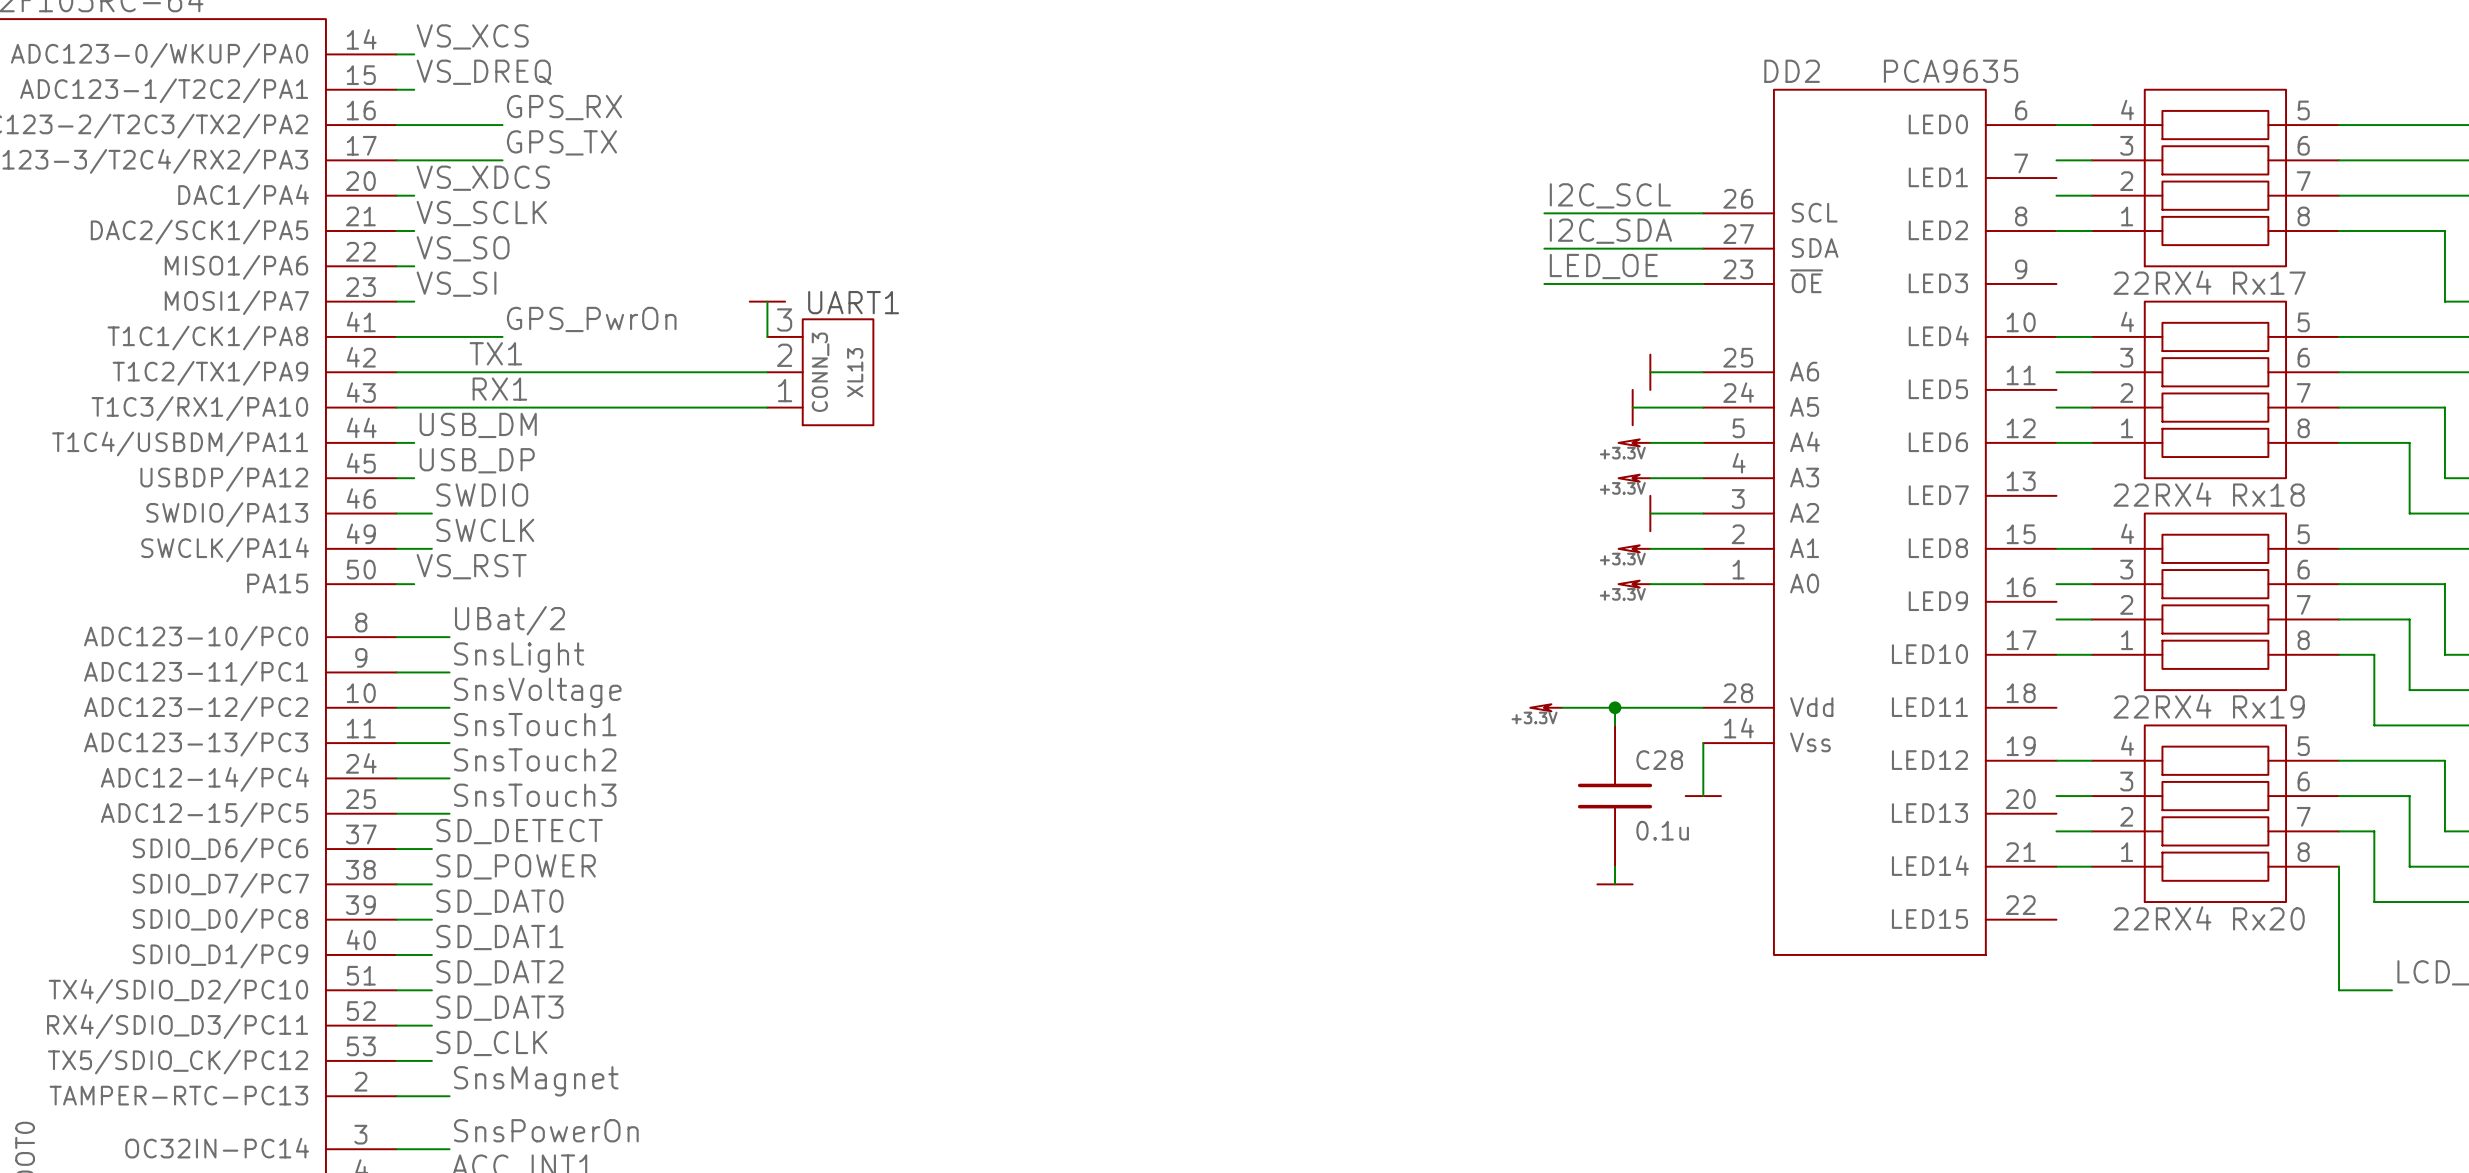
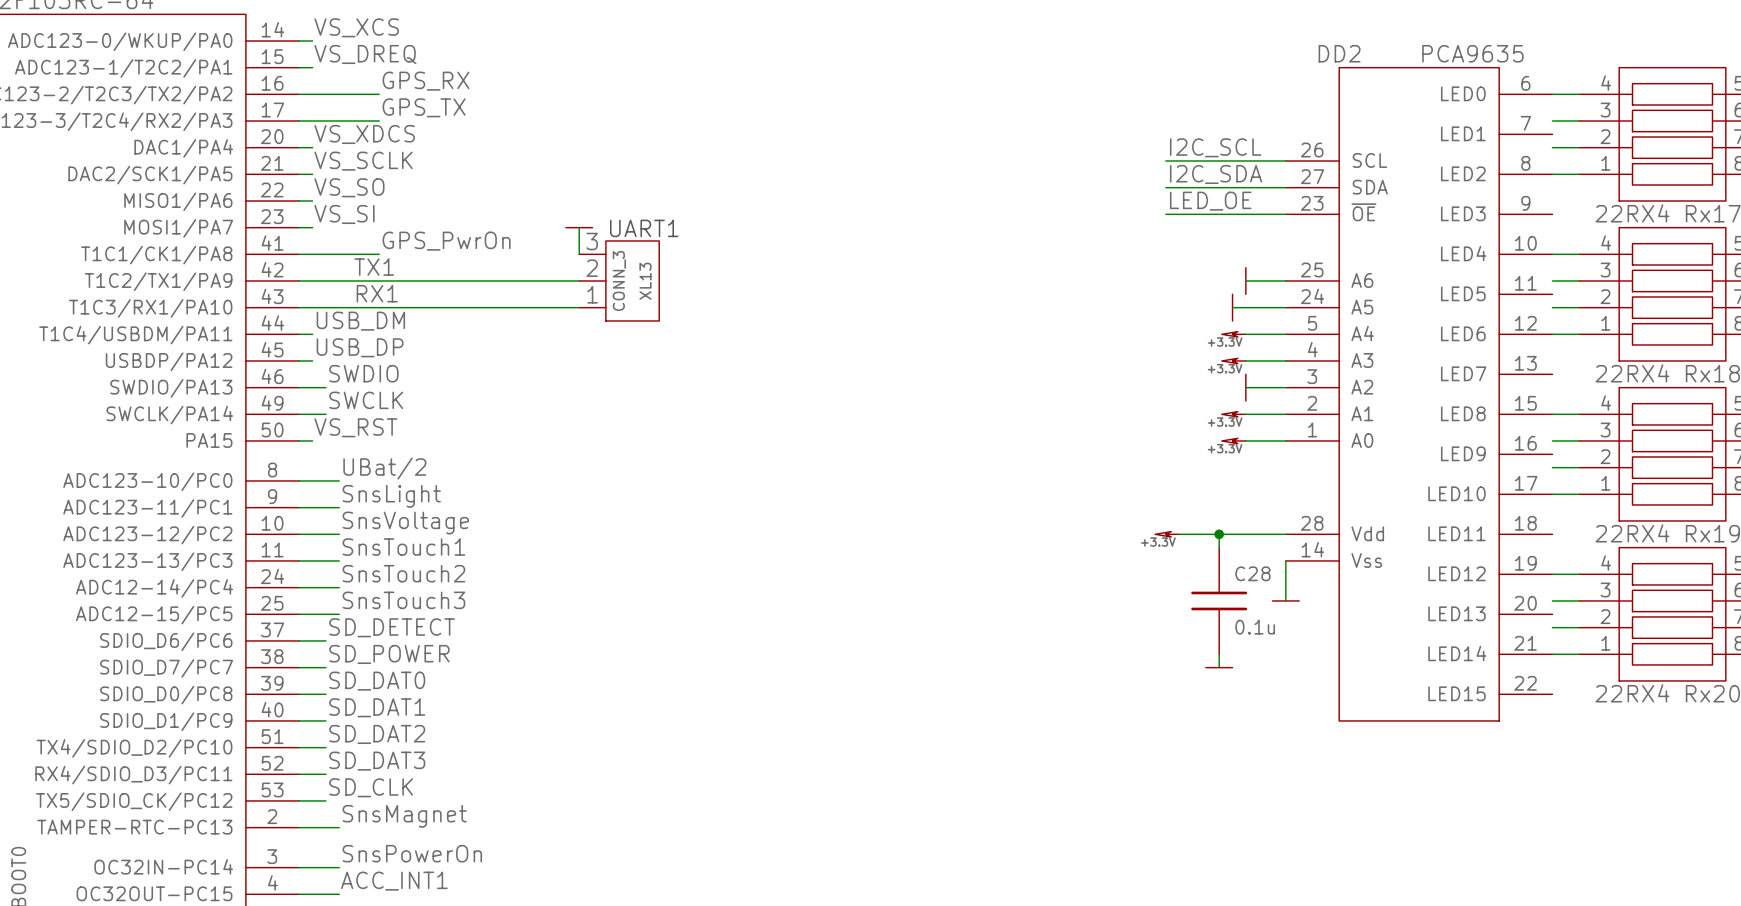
DD2 name position: DD2 (1792, 71) -> DD2 (1339, 53)

